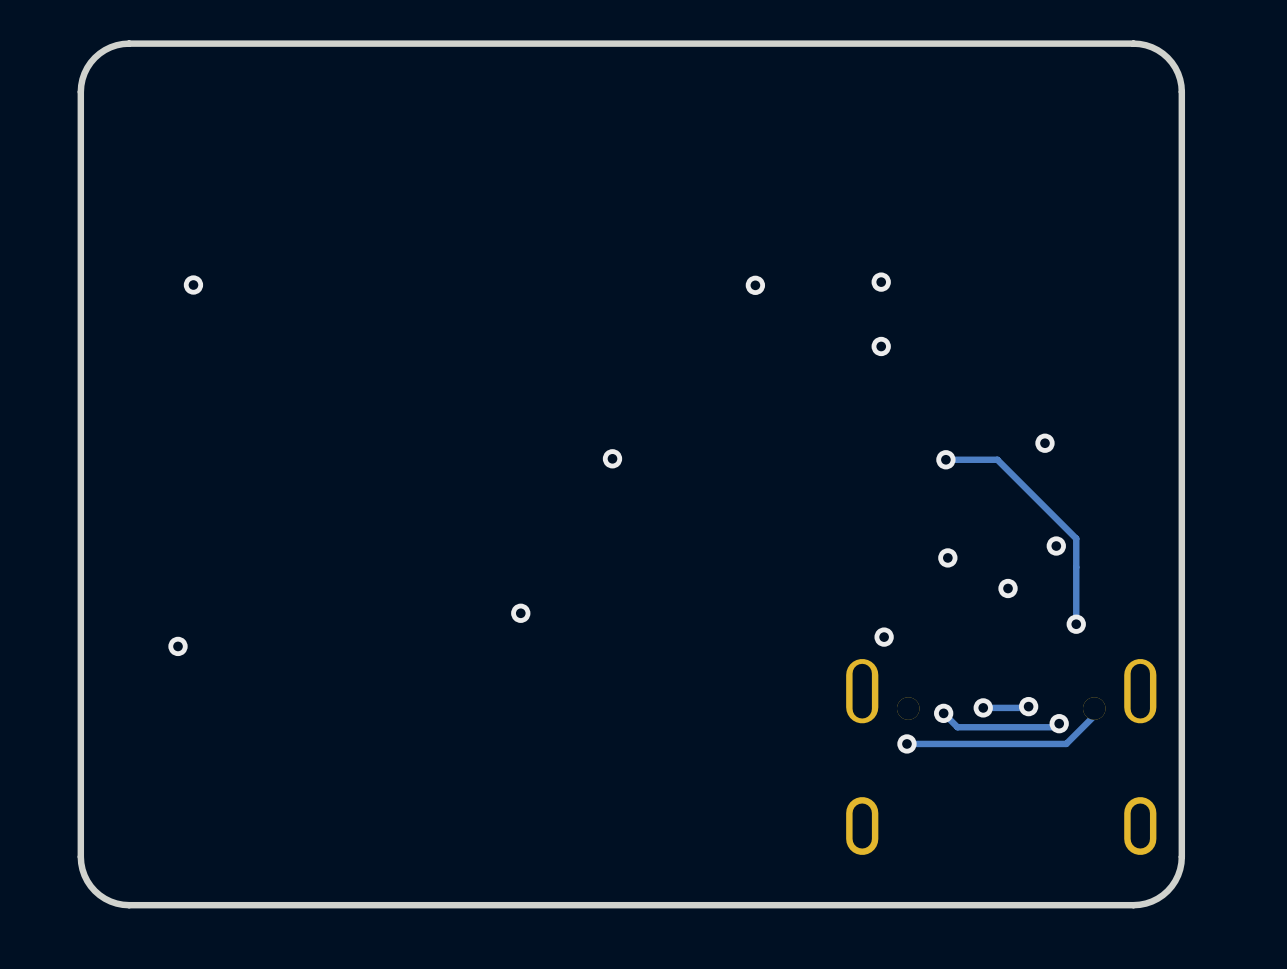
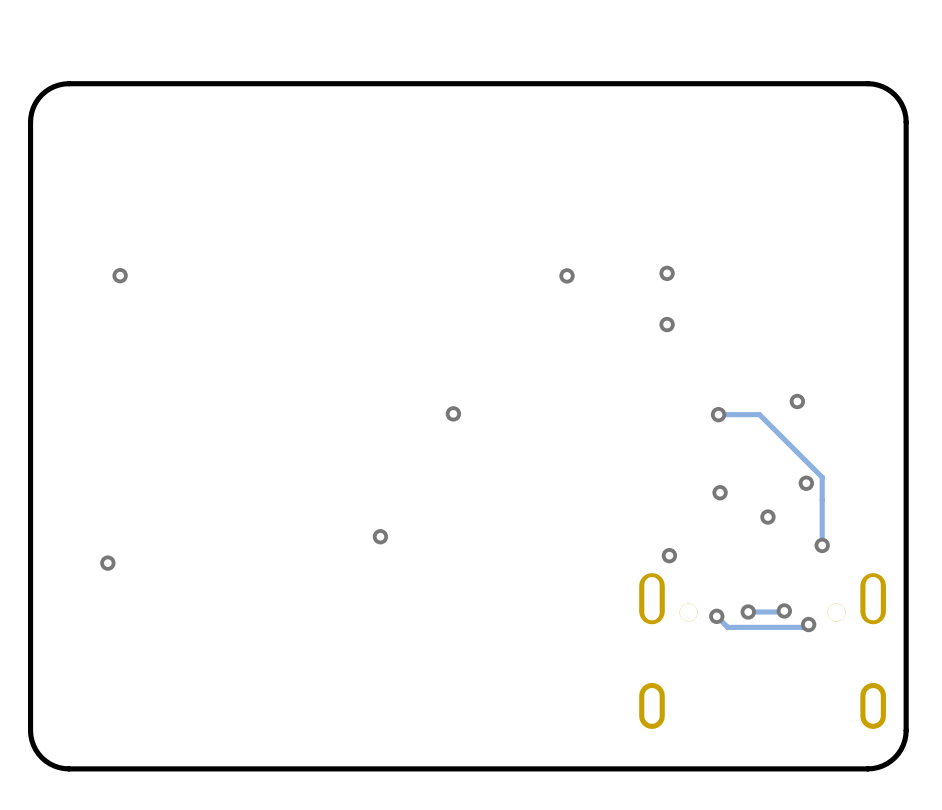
track: (1094, 708) (1094, 715) (1066, 743) (906, 743) -> none
via: (906, 743) -> none

